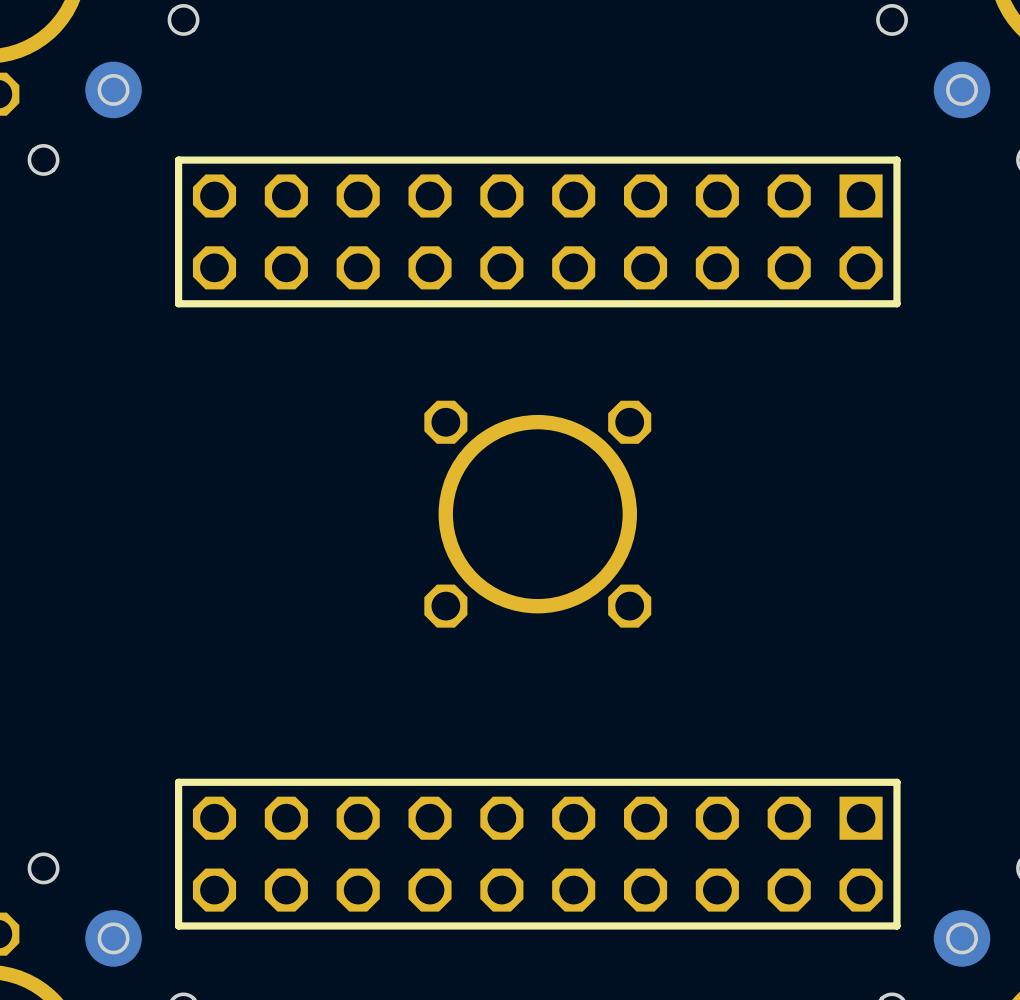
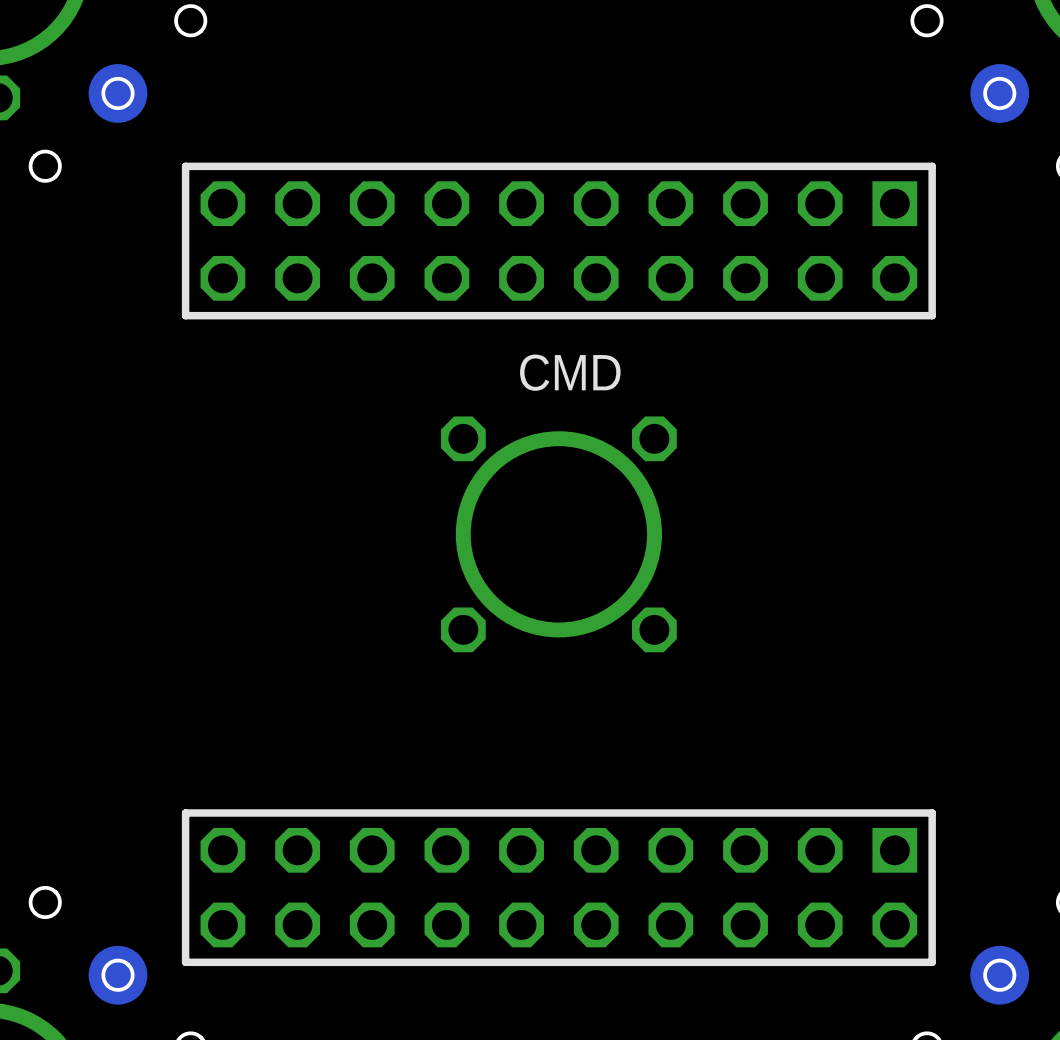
text: none -> CMD (570, 372)

